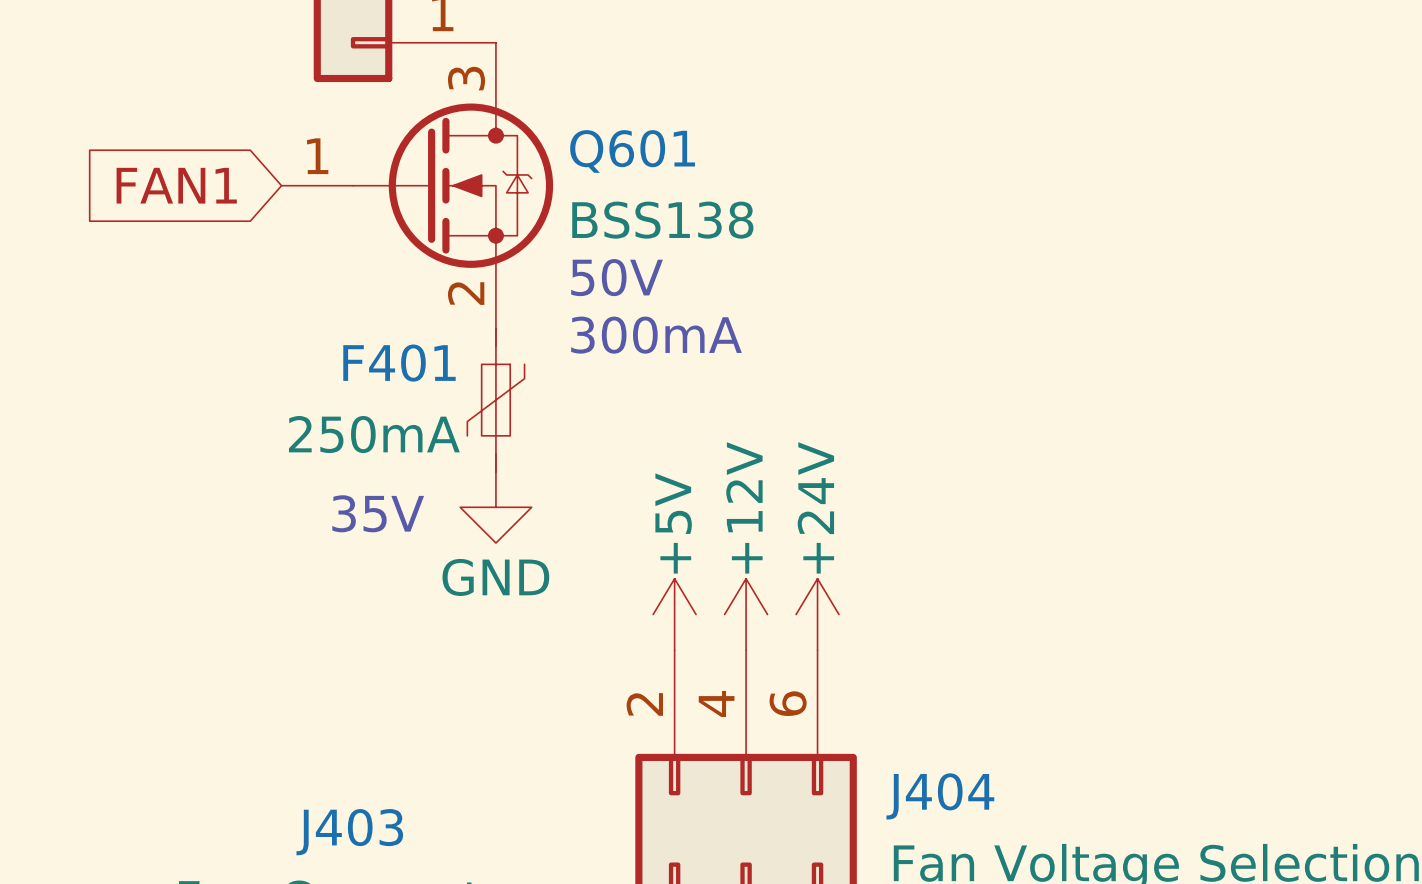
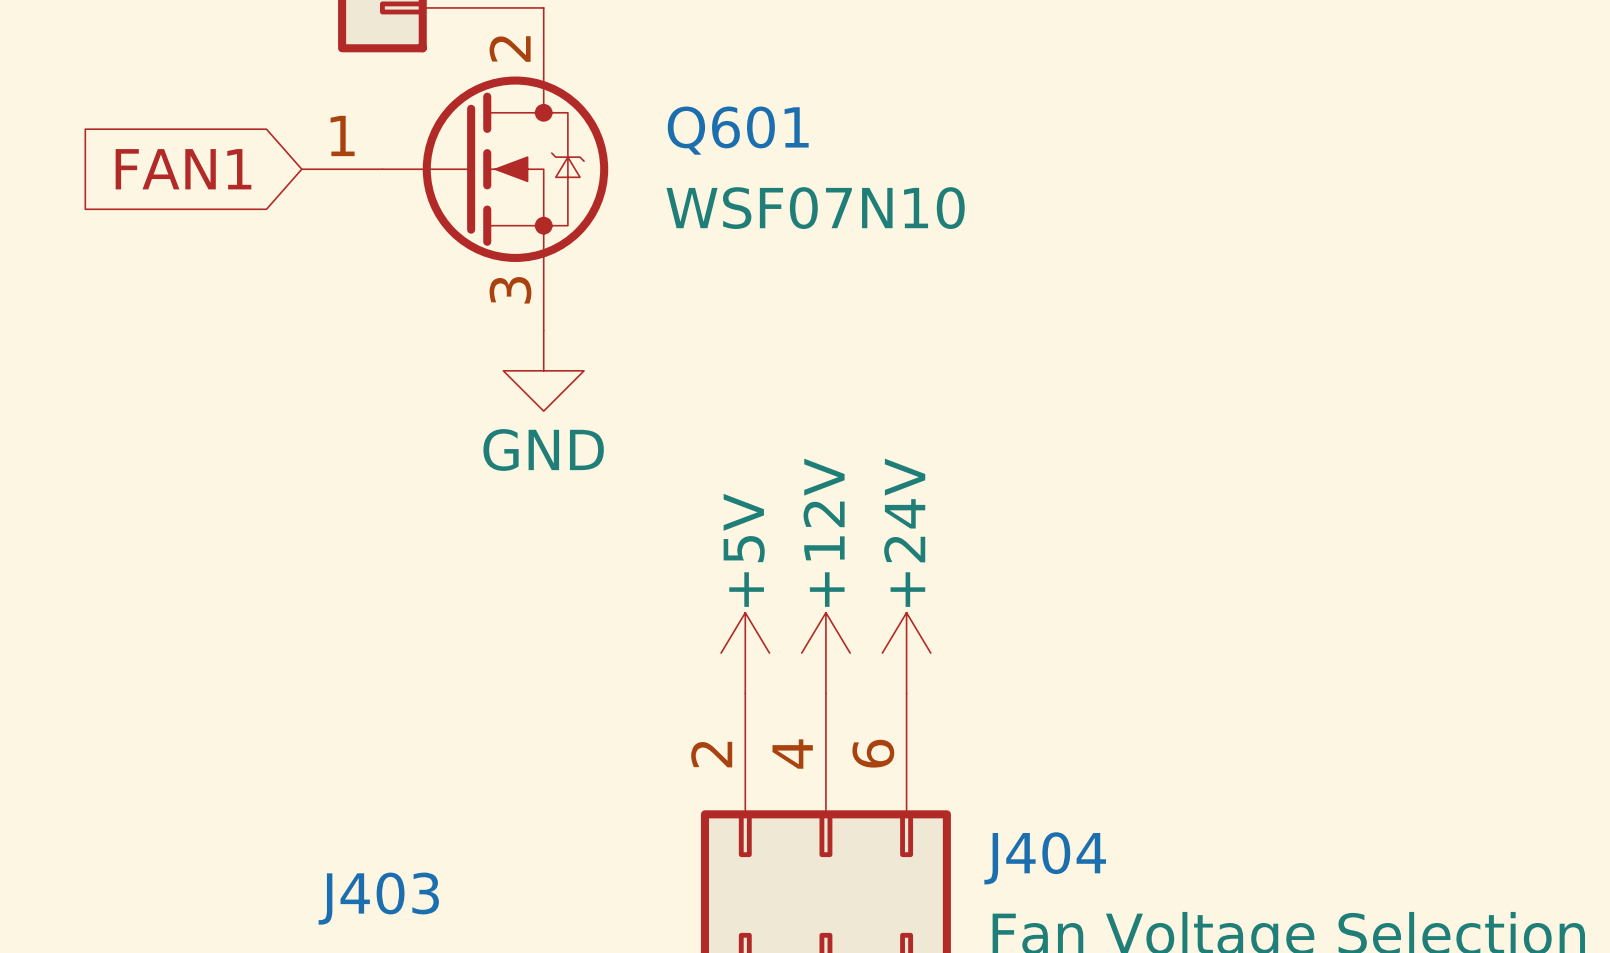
Q601 pin number: 3 (466, 78) -> 2 (510, 49)
Q601 name position: Q601 (632, 151) -> Q601 (738, 130)
Q601 value: BSS138 (662, 220) -> WSF07N10 (815, 208)
text: 50V (617, 277) -> none
Q601 pin number: 2 (466, 293) -> 3 (510, 290)
text: 300mA (656, 335) -> none
F401: 250mA (495, 400) -> none
power symbol position: GND (495, 507) -> GND (543, 370)
text: 35V (378, 513) -> none

